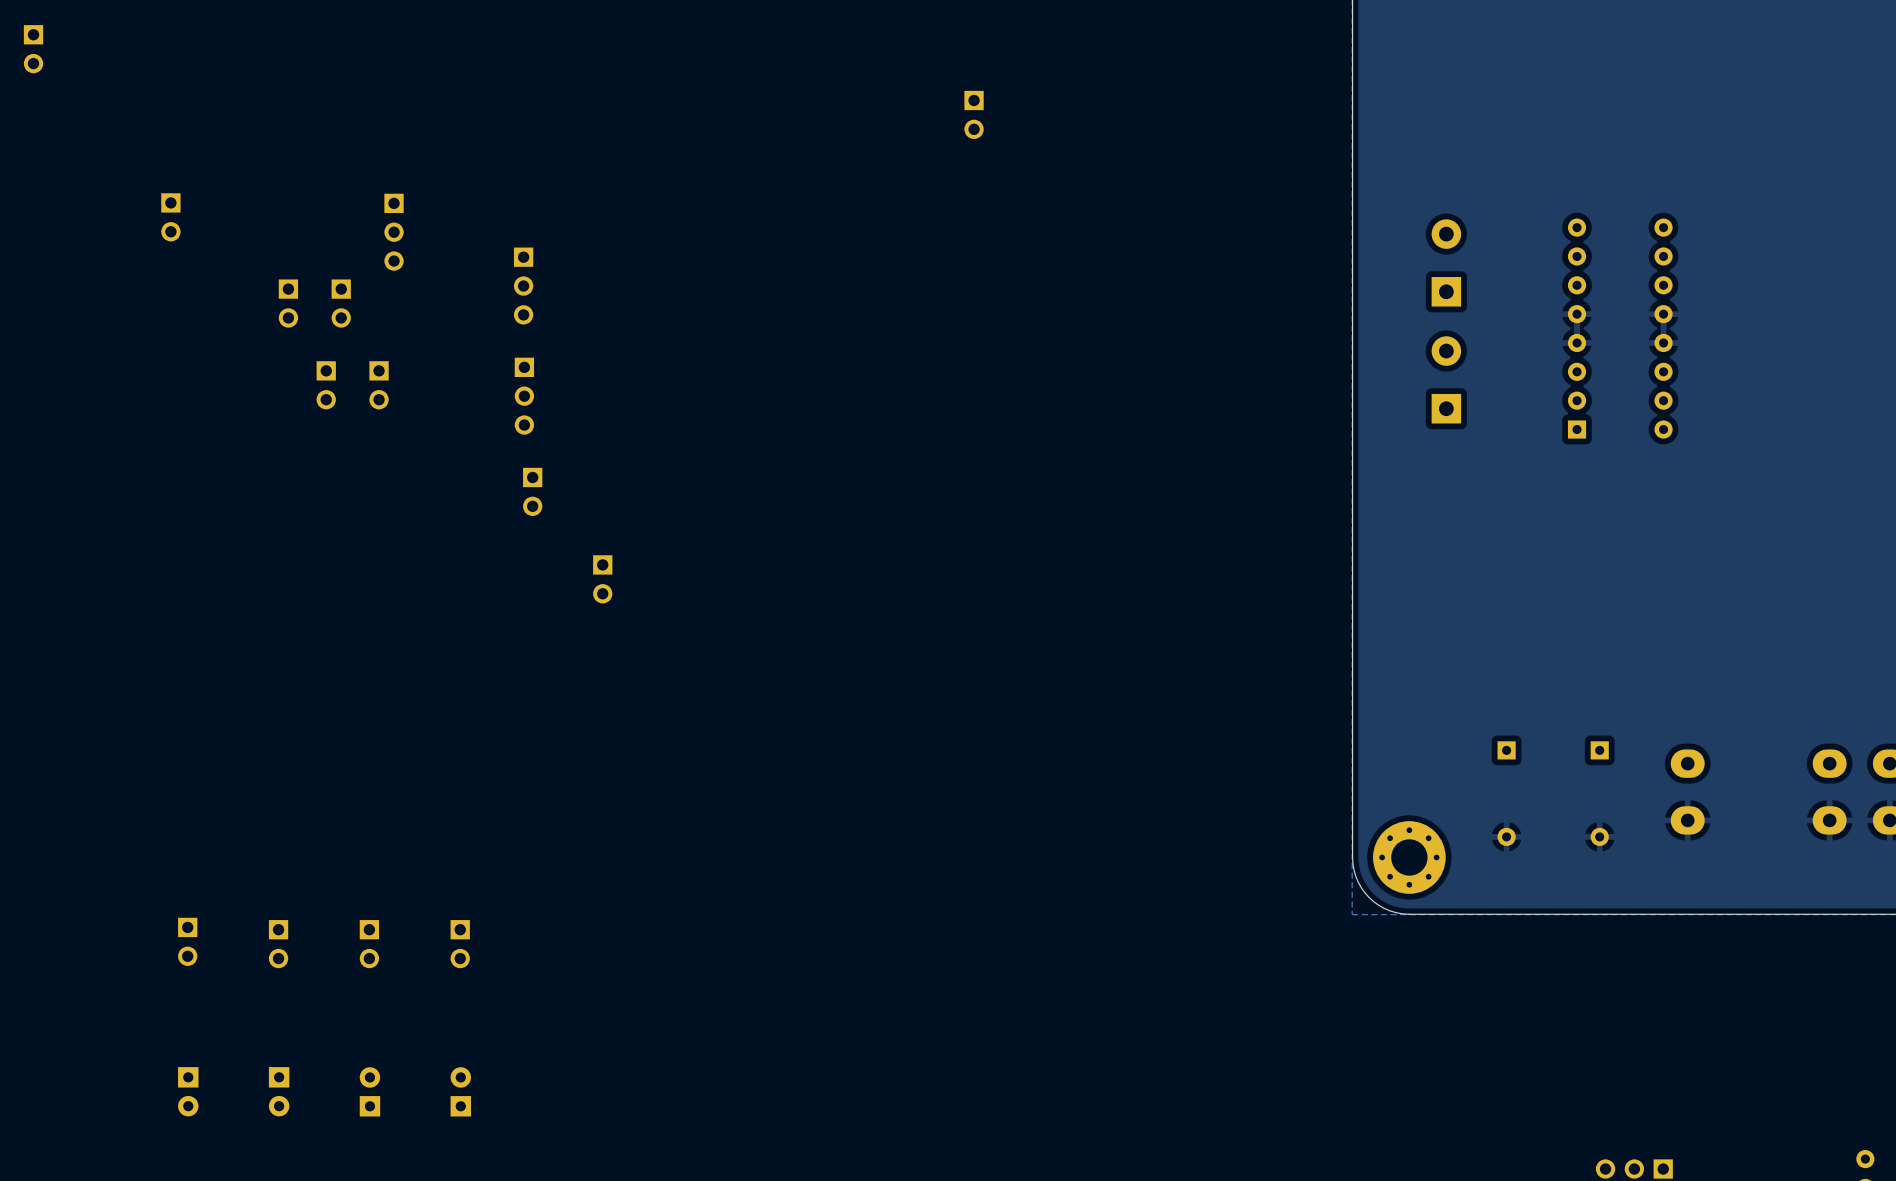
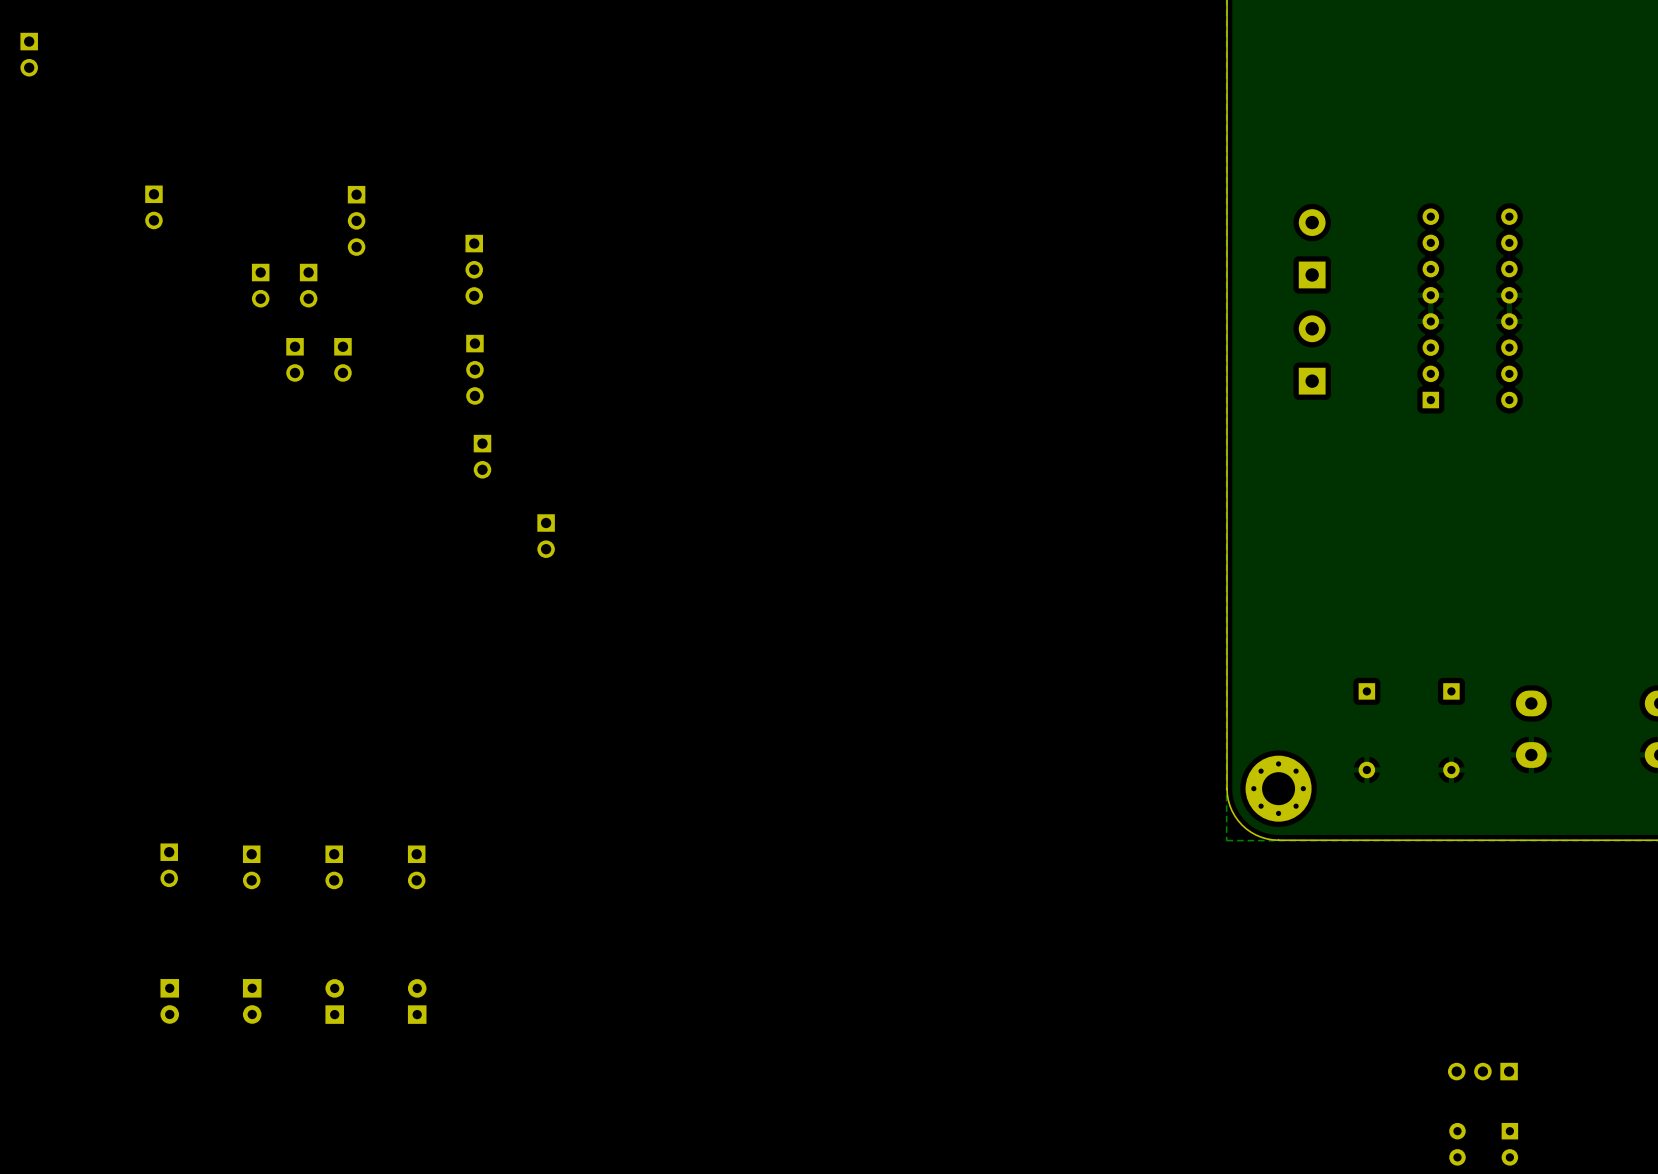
part: (974, 114) -> none

